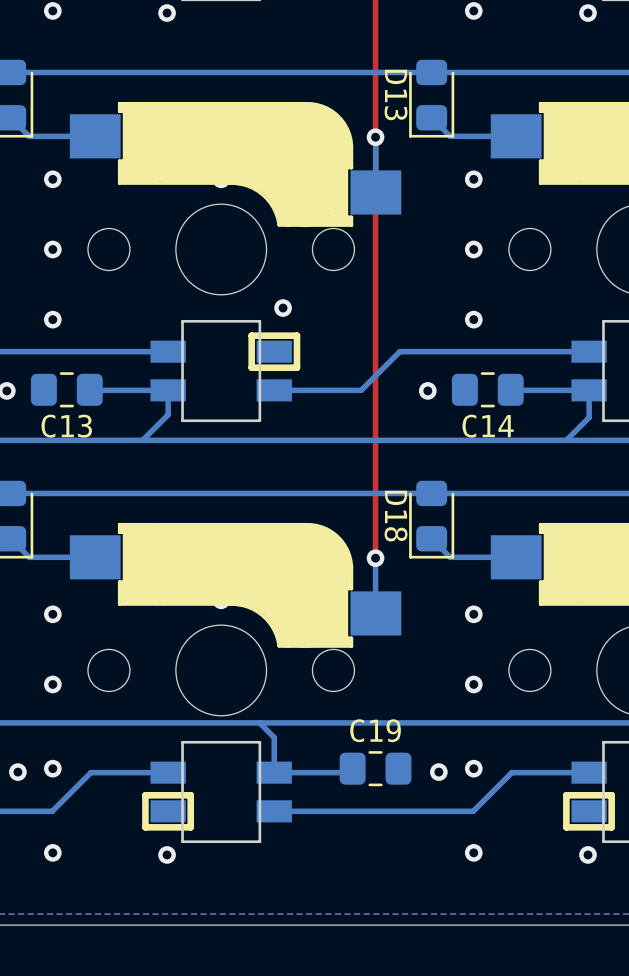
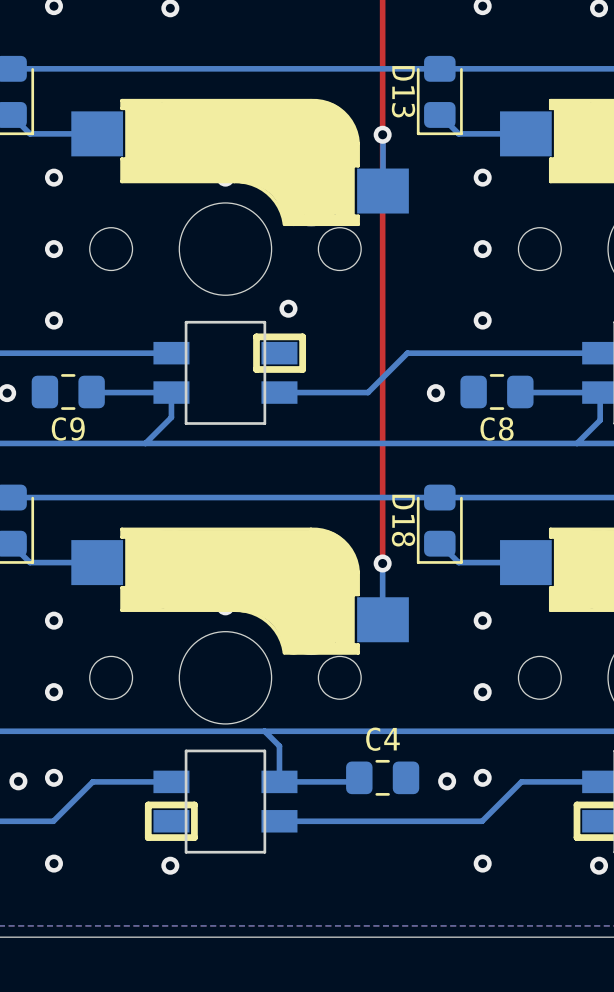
C13 name: C13 (66, 426) -> C9 (68, 428)
C14 name: C14 (488, 426) -> C8 (497, 428)
C19 name: C19 (375, 730) -> C4 (382, 739)

